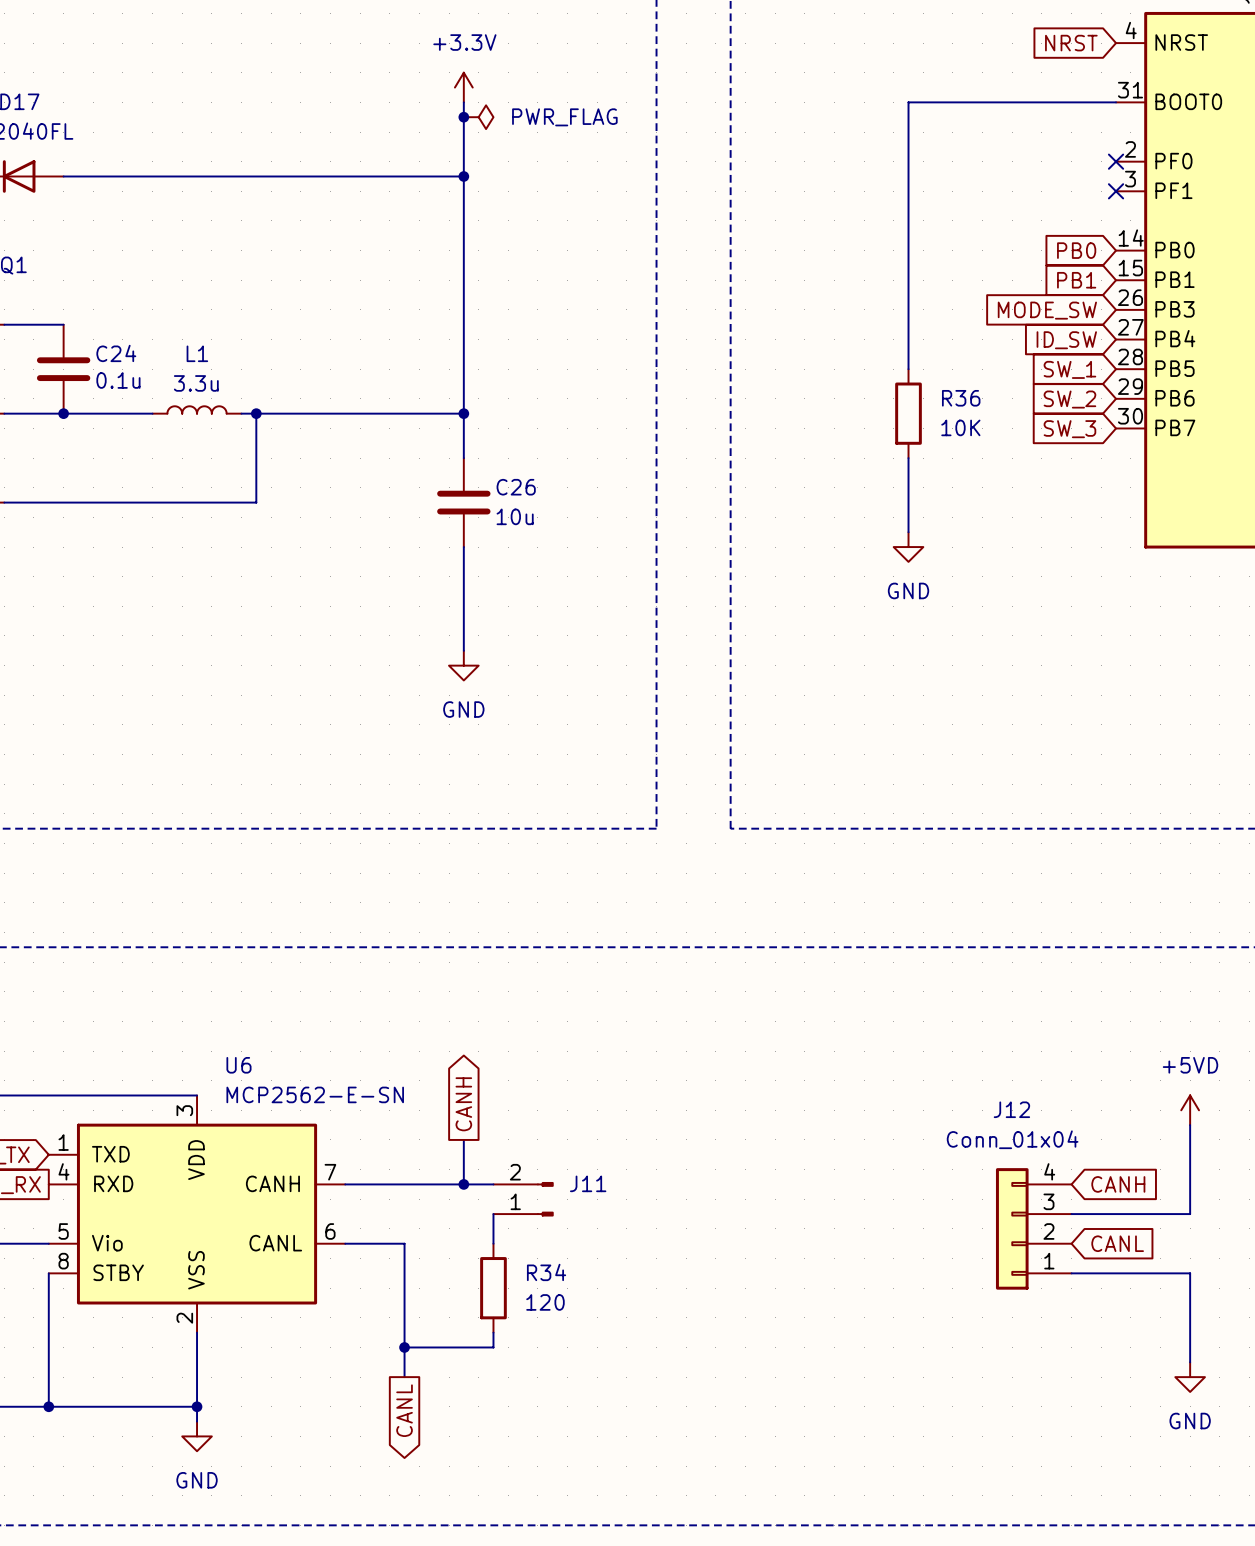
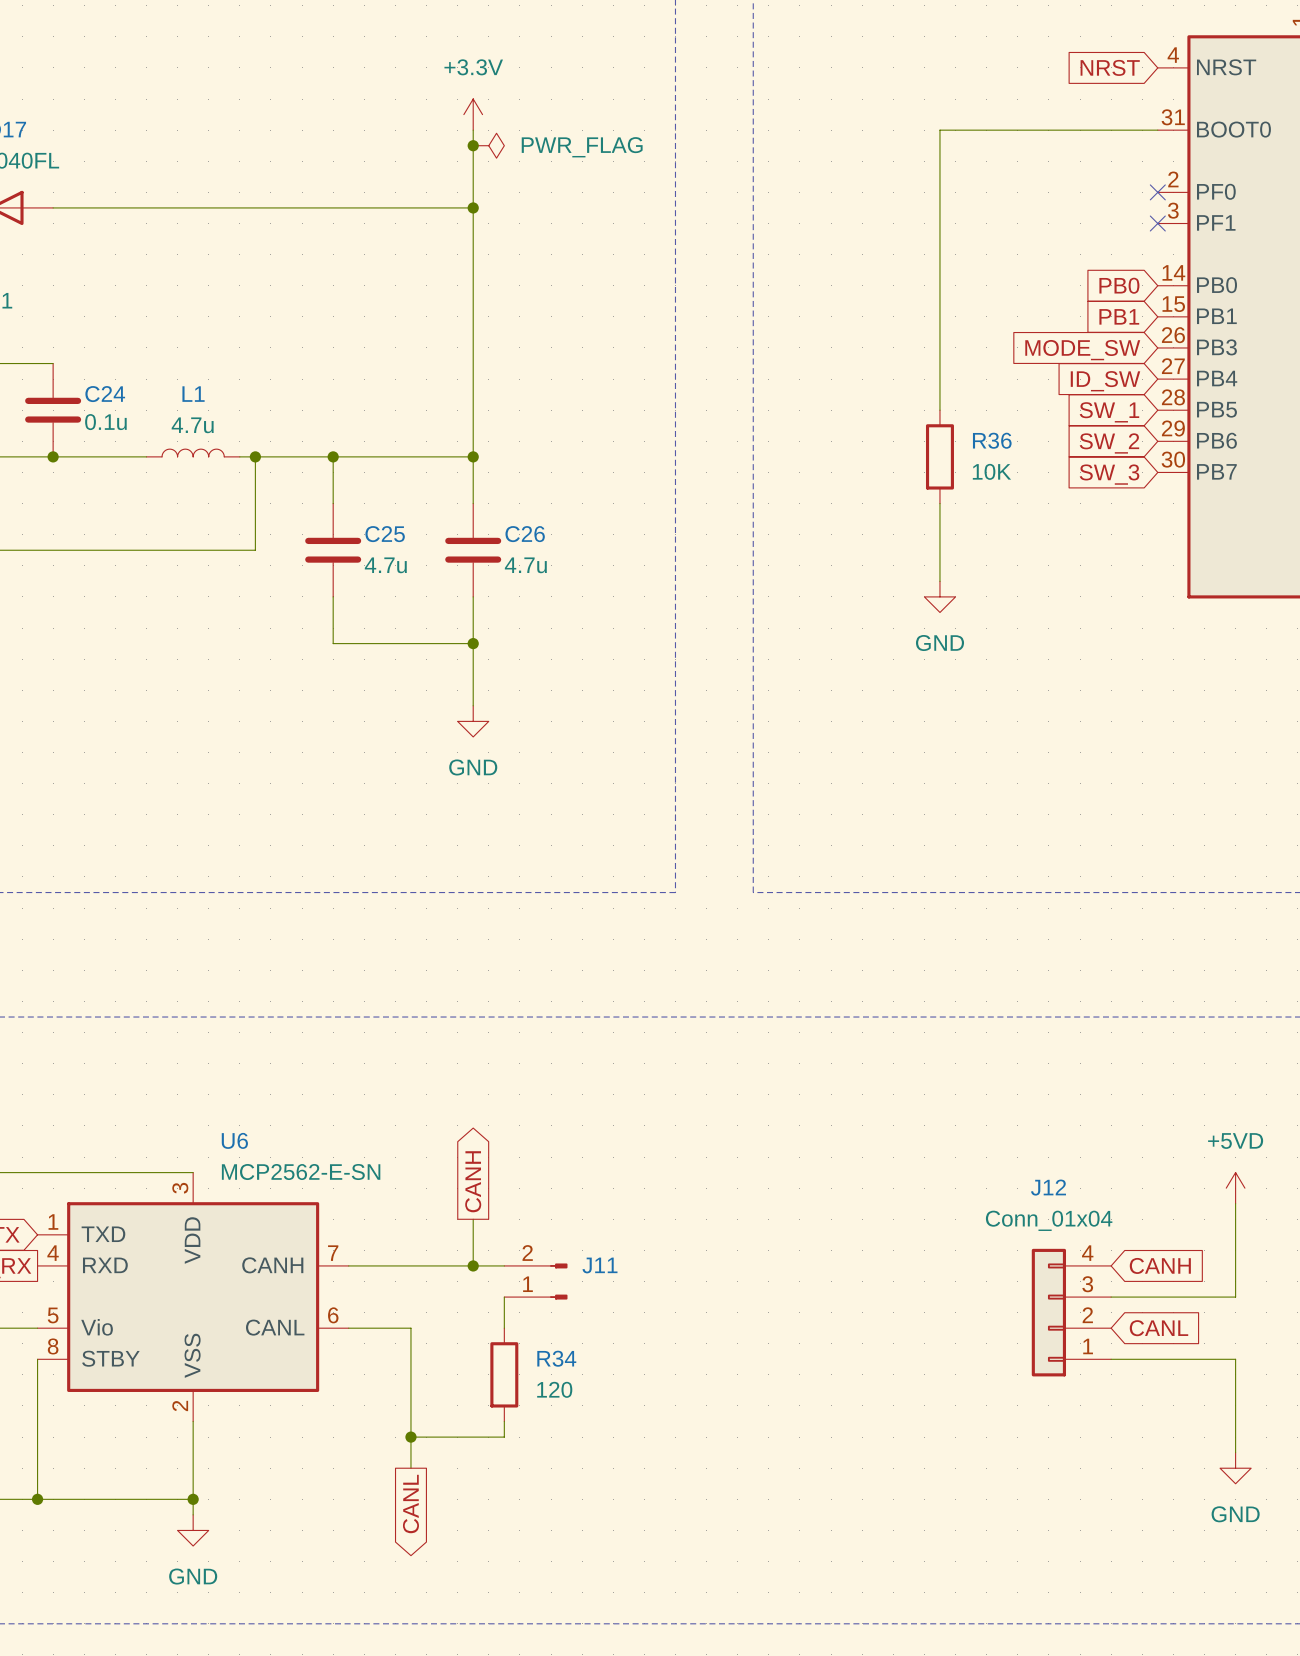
L1 value: 3.3u (196, 383) -> 4.7u (192, 425)
wire: none -> (333, 456) (333, 503)
junction: none -> (333, 456)
C25: none -> 4.7u (333, 550)
C26 value: 10u (515, 516) -> 4.7u (525, 565)
wire: none -> (333, 596) (333, 643) (473, 643)
junction: none -> (473, 643)

